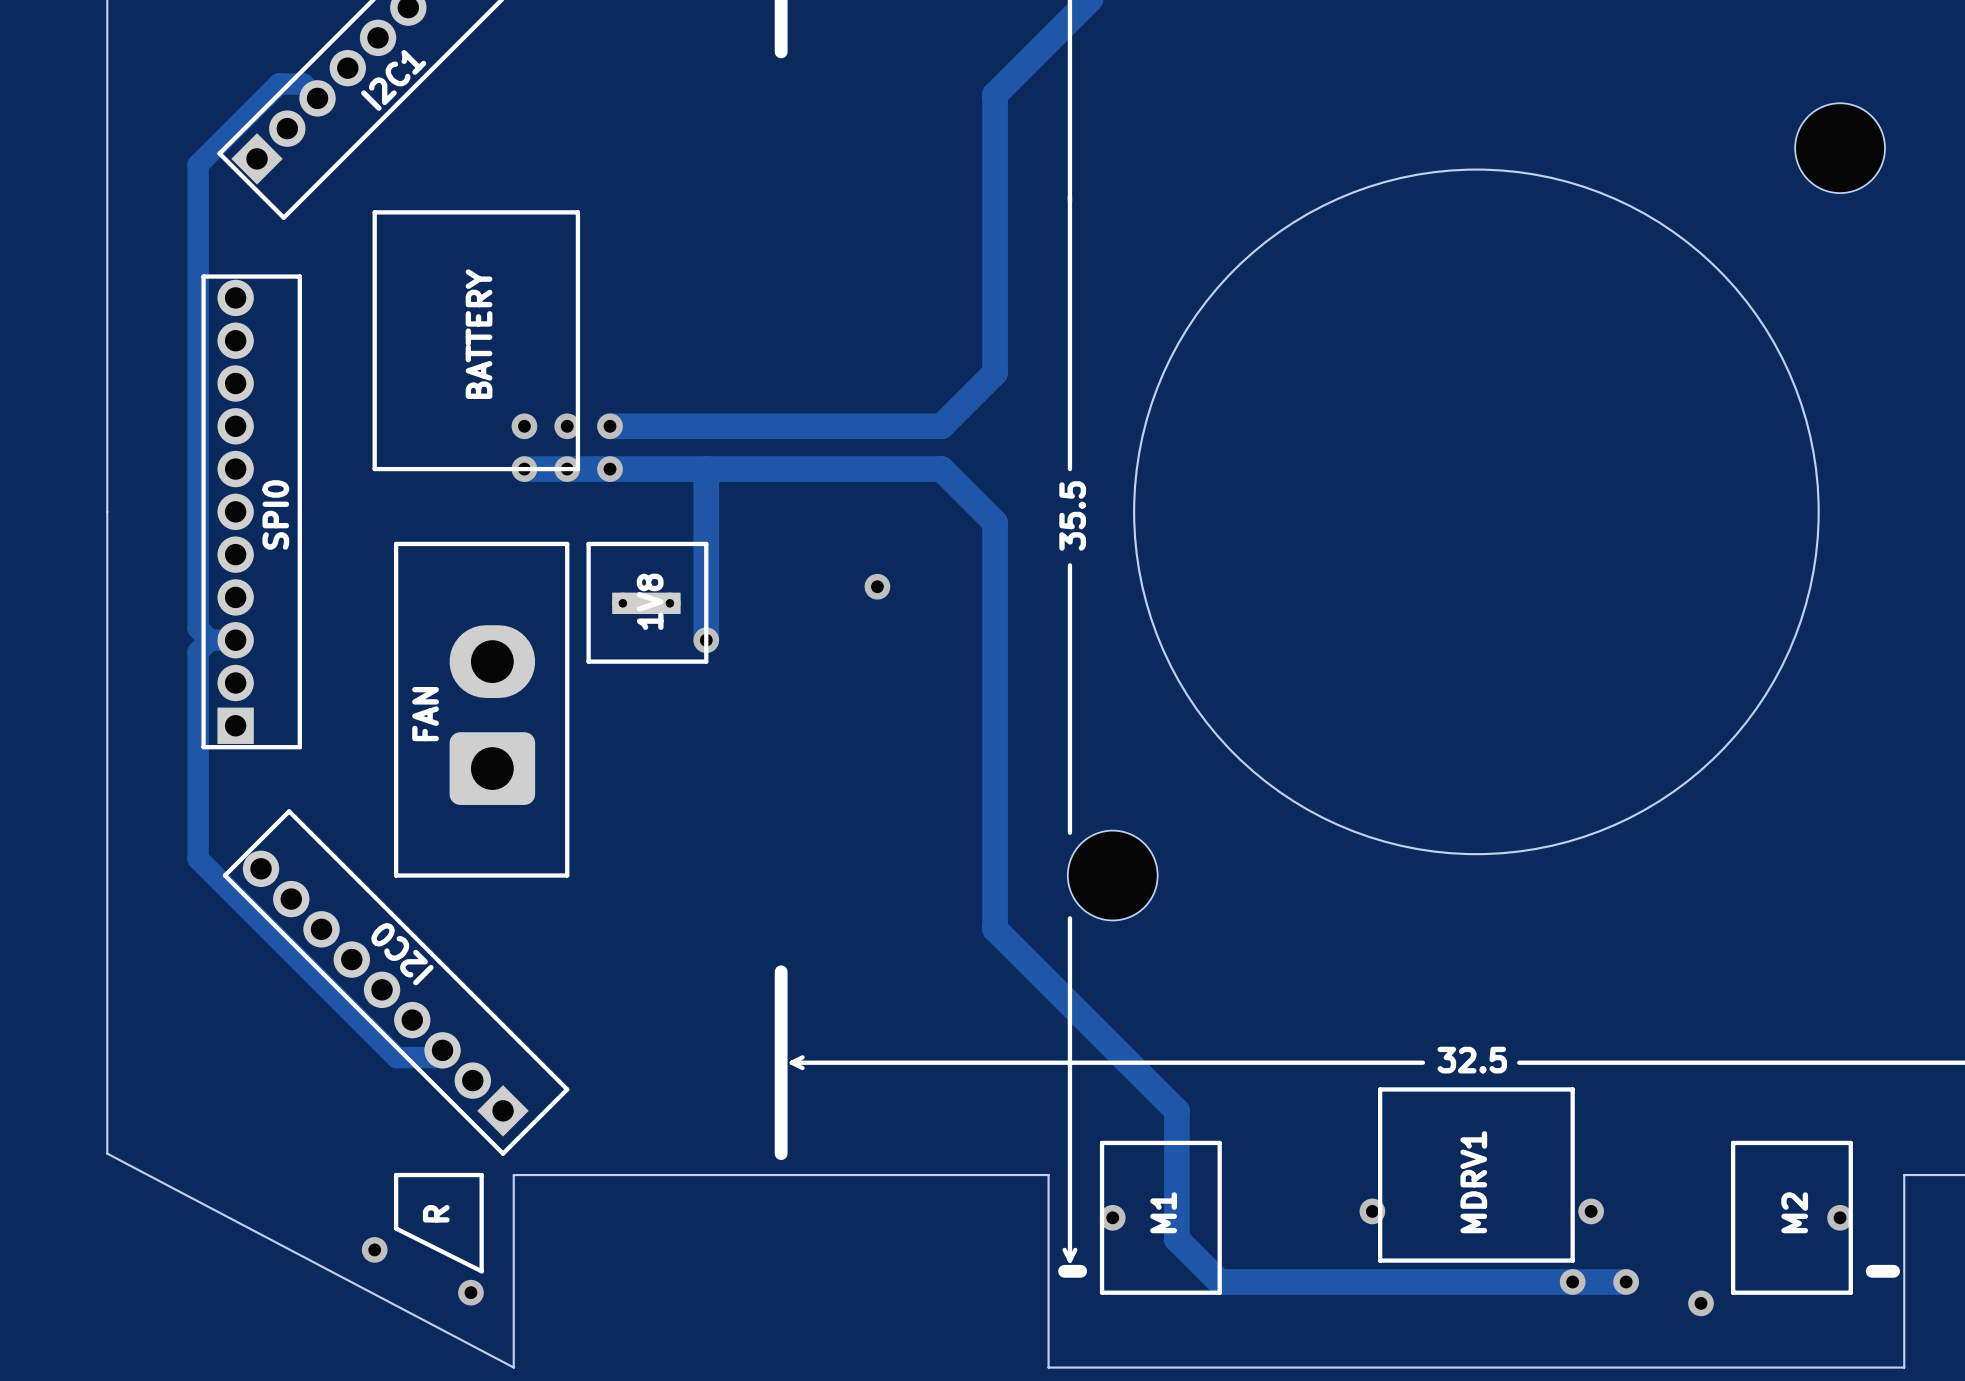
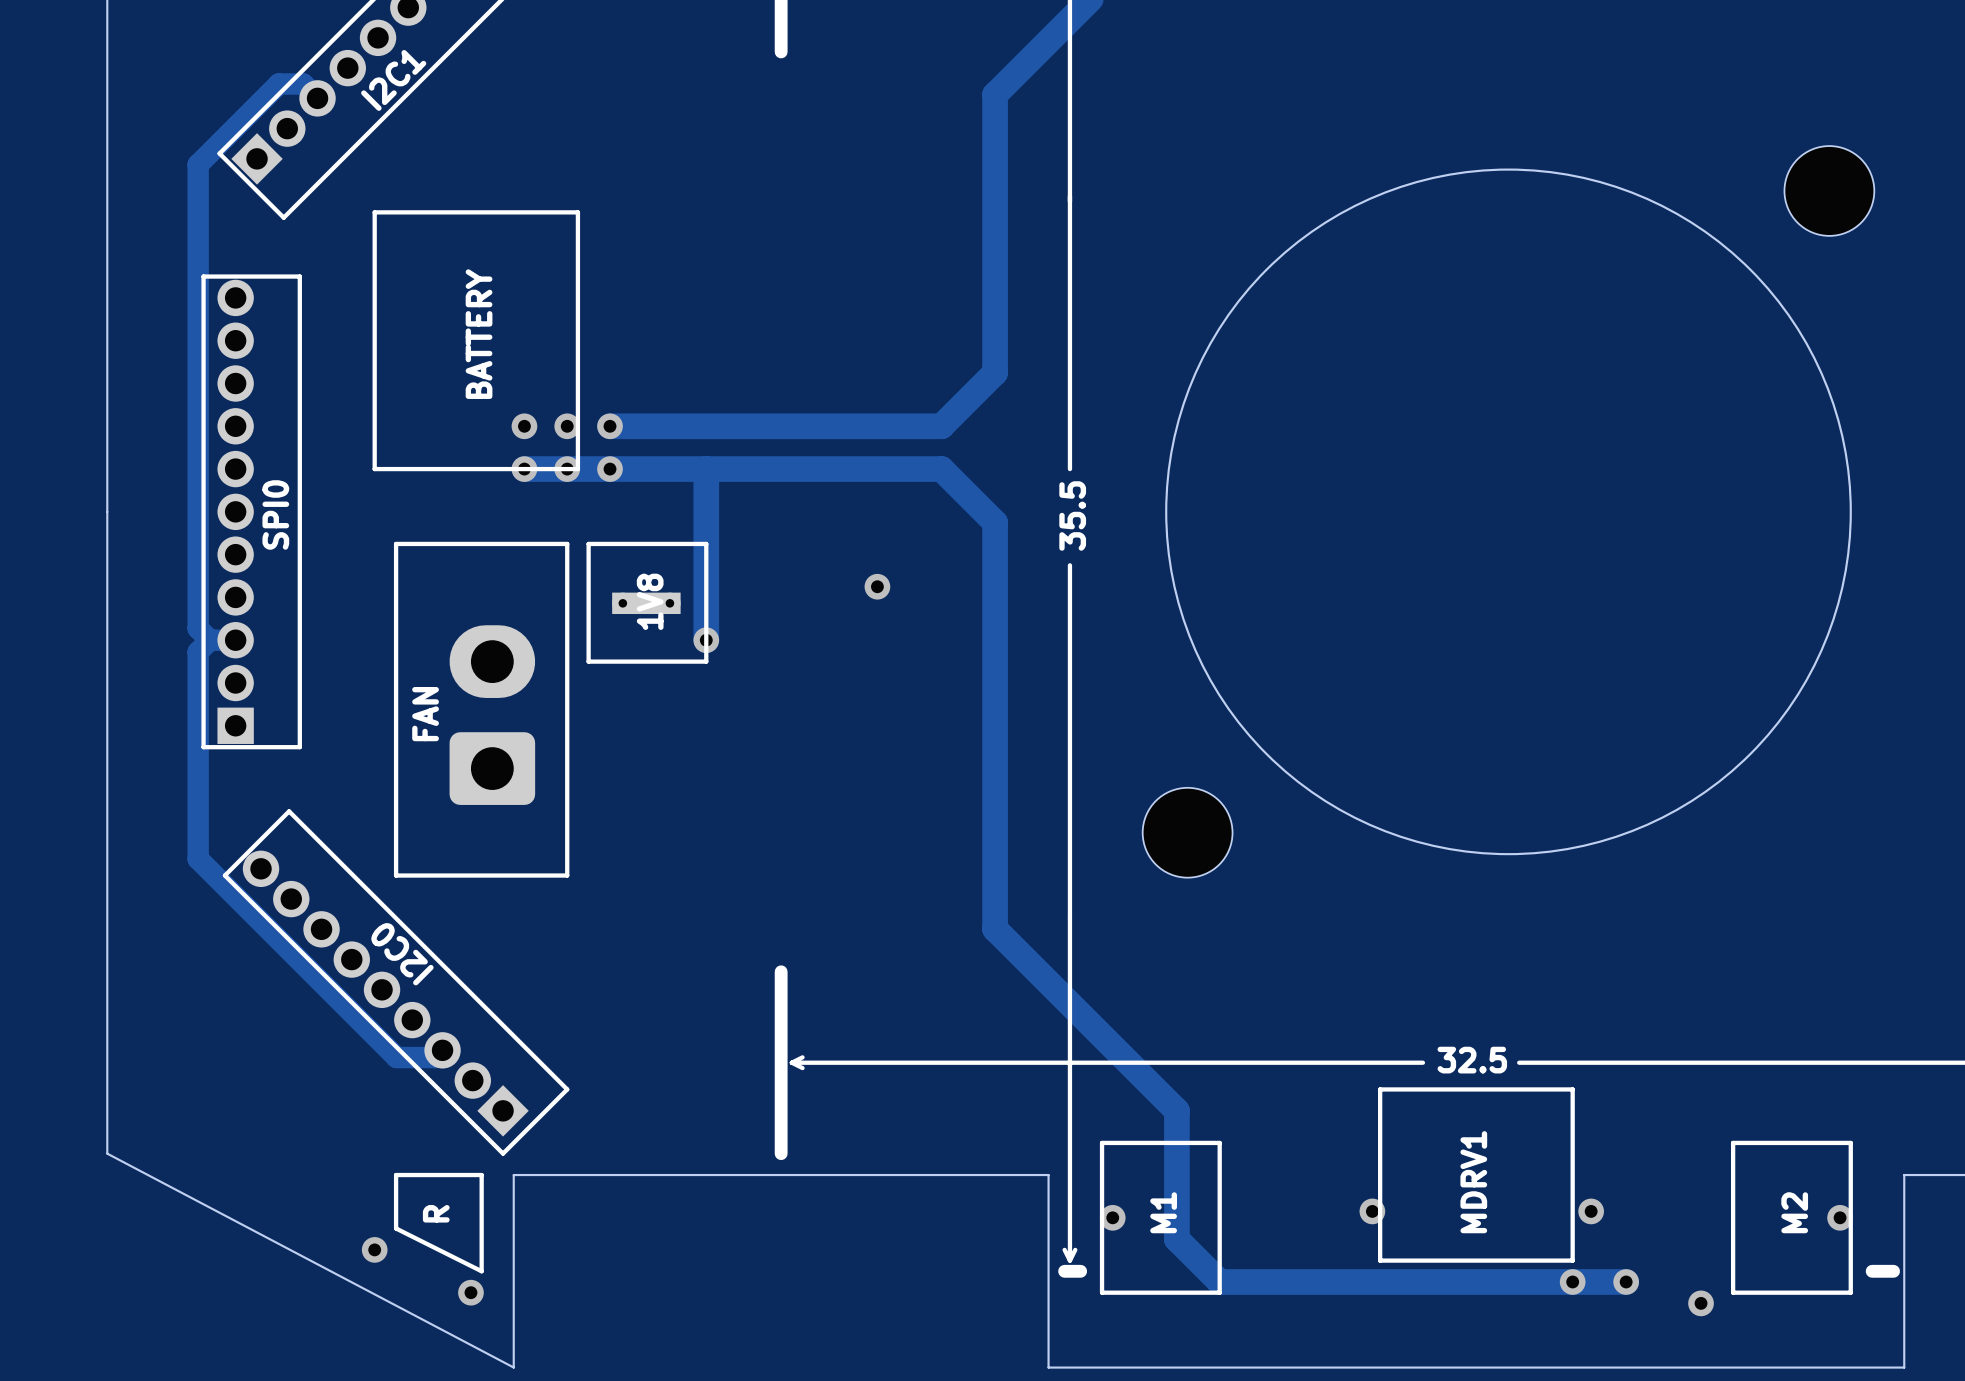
part position: (1840, 148) -> (1829, 190)
round board edge position: (1476, 511) -> (1508, 511)
line: none -> (1069, 832) (1069, 918)
part position: (1112, 875) -> (1187, 832)

